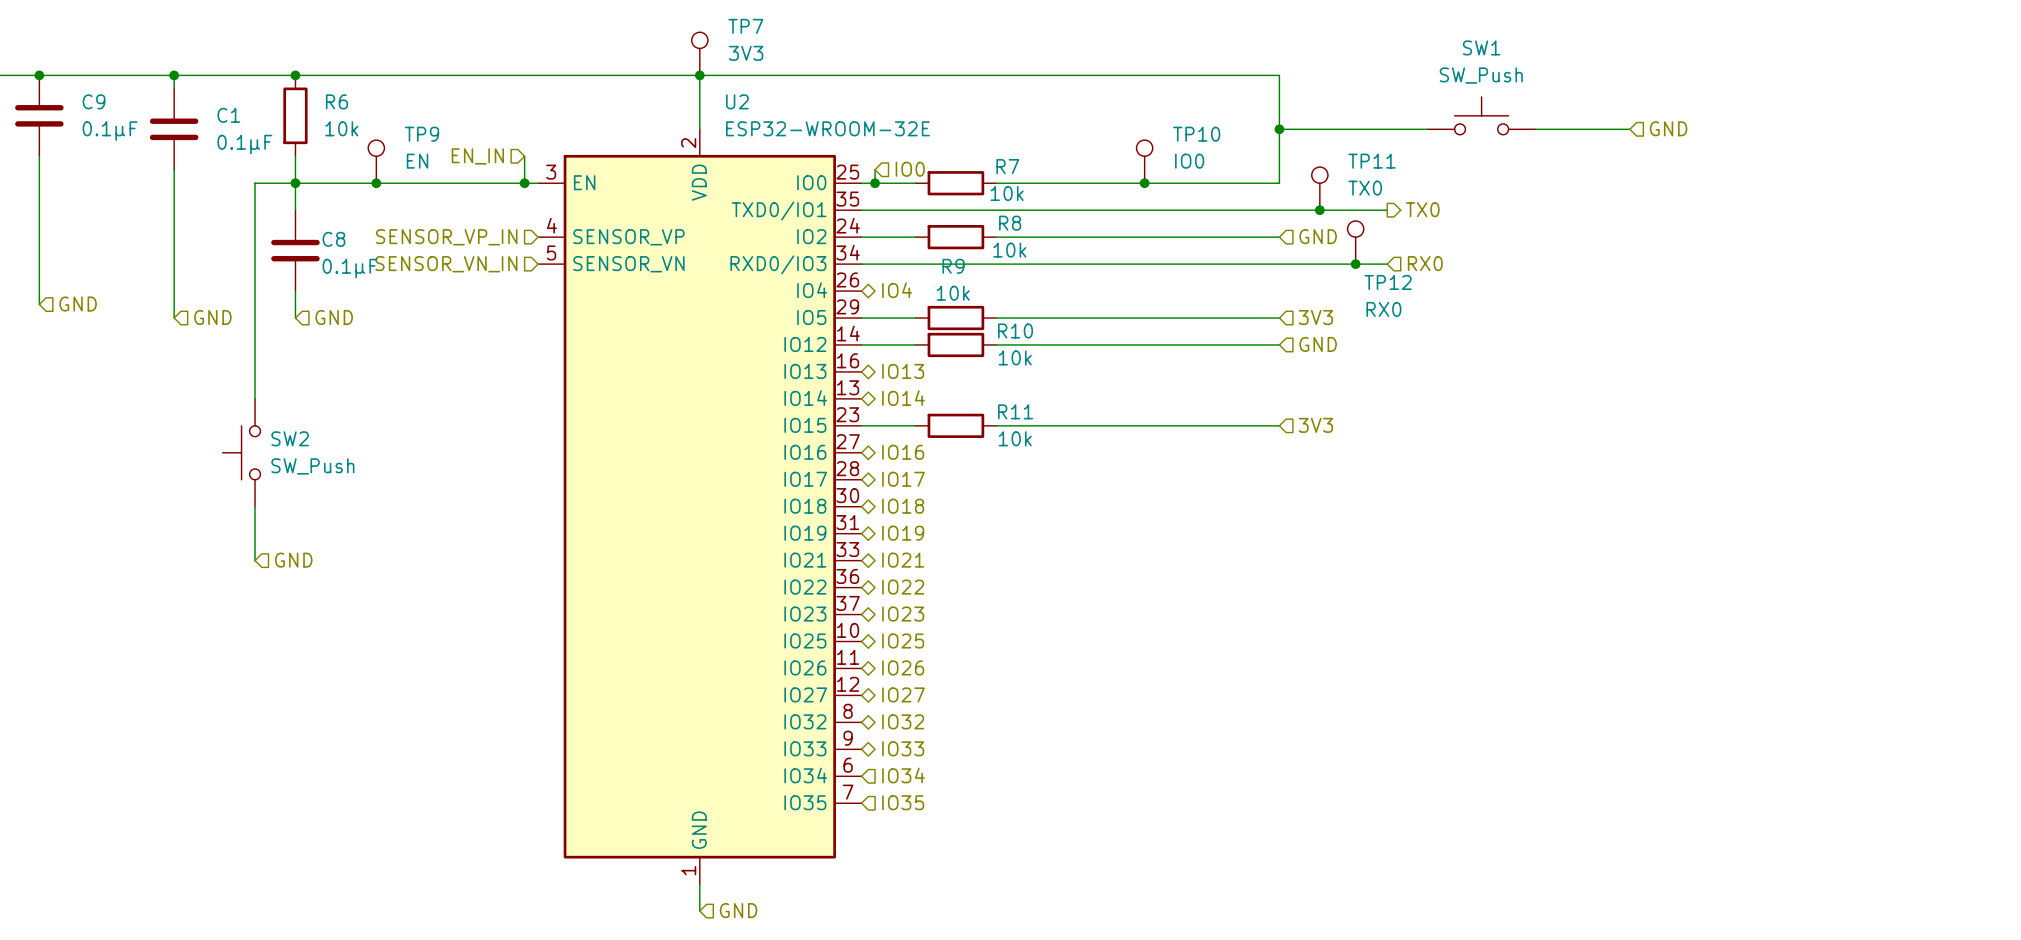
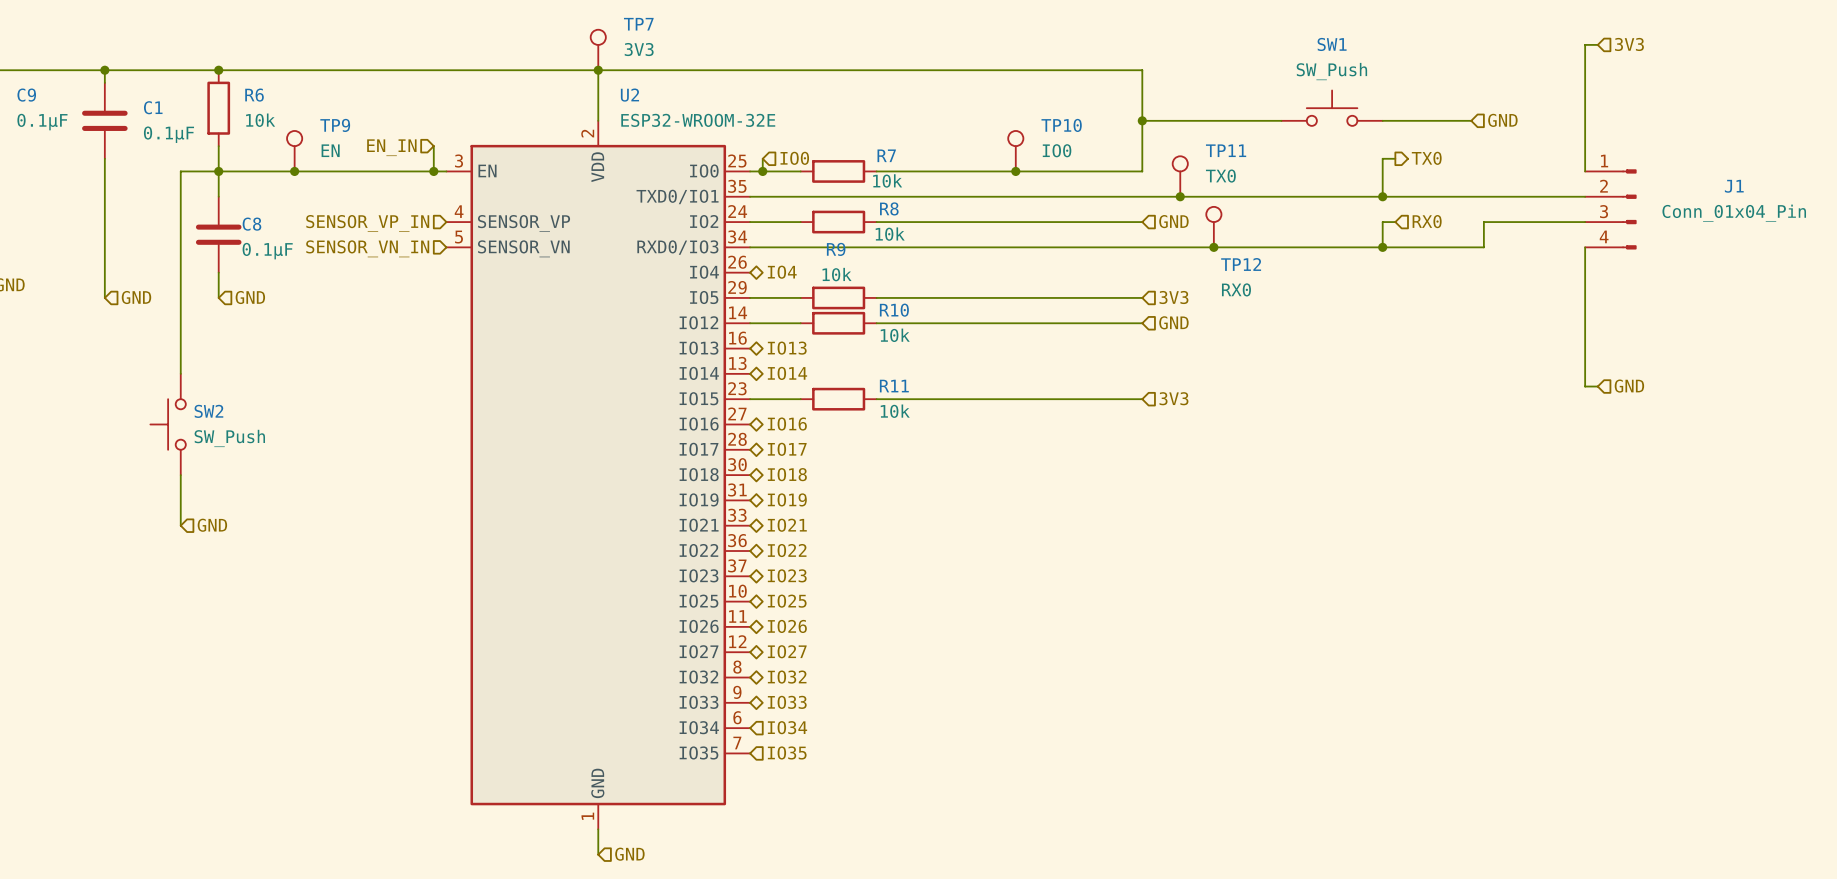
hierarchical label: none -> 3V3 (1629, 44)
wire: none -> (1597, 44) (1585, 44) (1585, 171)
wire: none -> (1395, 158) (1382, 158) (1382, 196)
hierarchical label position: TX0 (1422, 209) -> TX0 (1426, 158)
wire: none -> (1243, 196) (1585, 196)
junction: none -> (1382, 196)
J1: none -> Conn_01x04_Pin (1610, 209)
wire: none -> (1395, 222) (1382, 222) (1382, 247)
wire: none -> (1585, 222) (1483, 222) (1483, 247) (1243, 247)
hierarchical label position: RX0 (1425, 263) -> RX0 (1427, 221)
junction: none -> (1382, 247)
wire: none -> (1585, 247) (1585, 386) (1597, 386)
hierarchical label: none -> GND (1629, 386)

